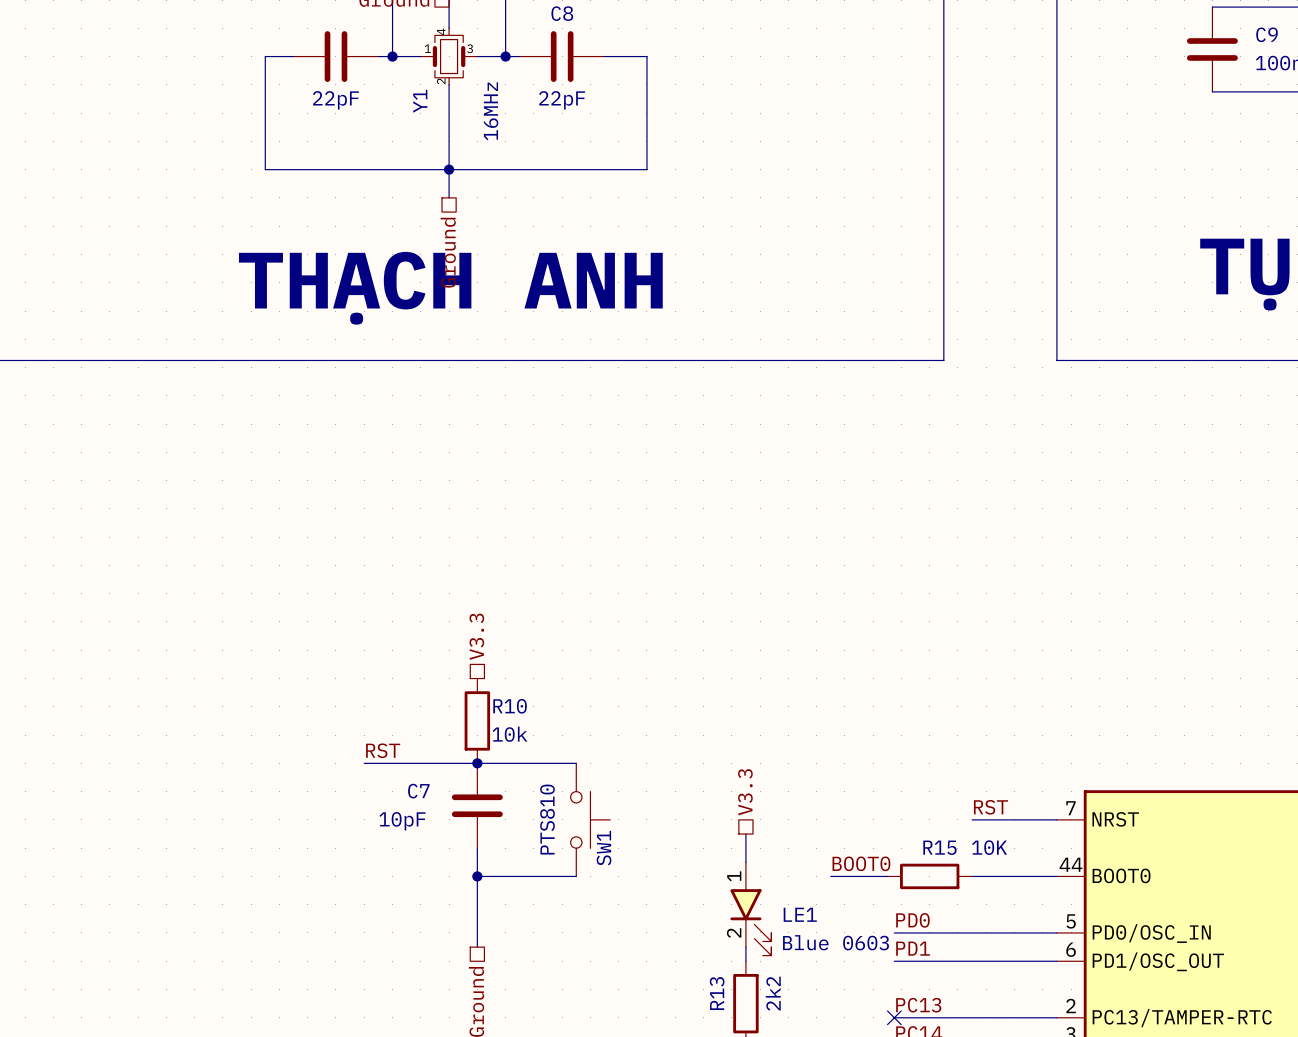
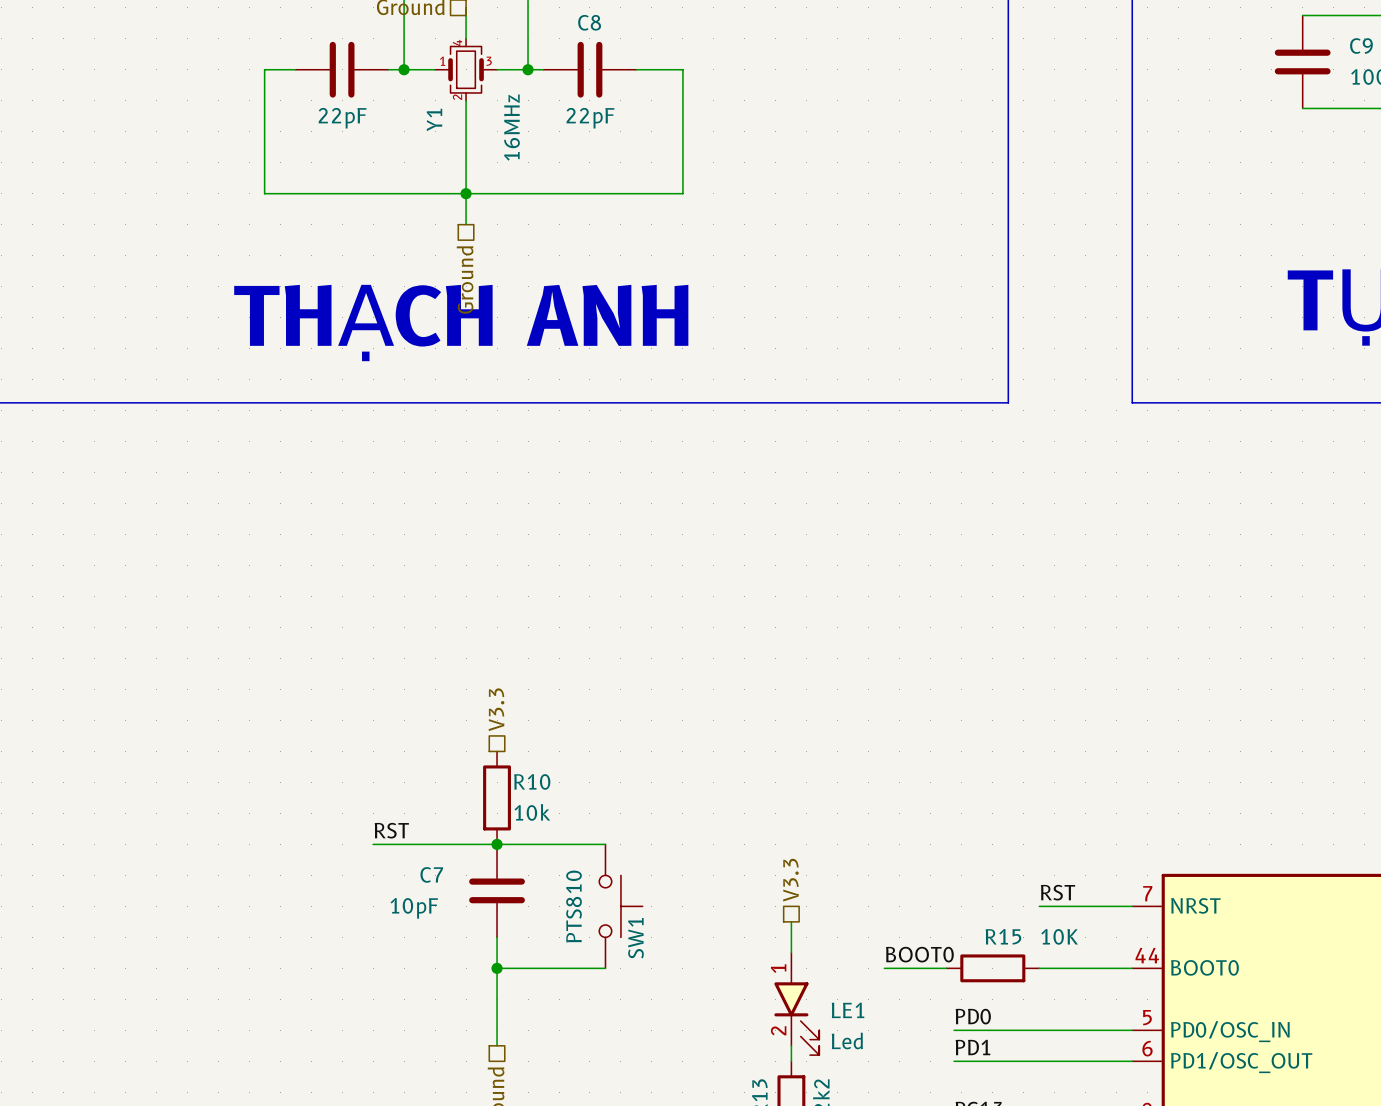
LE1 value: Blue 0603 (836, 942) -> Led (847, 1040)

